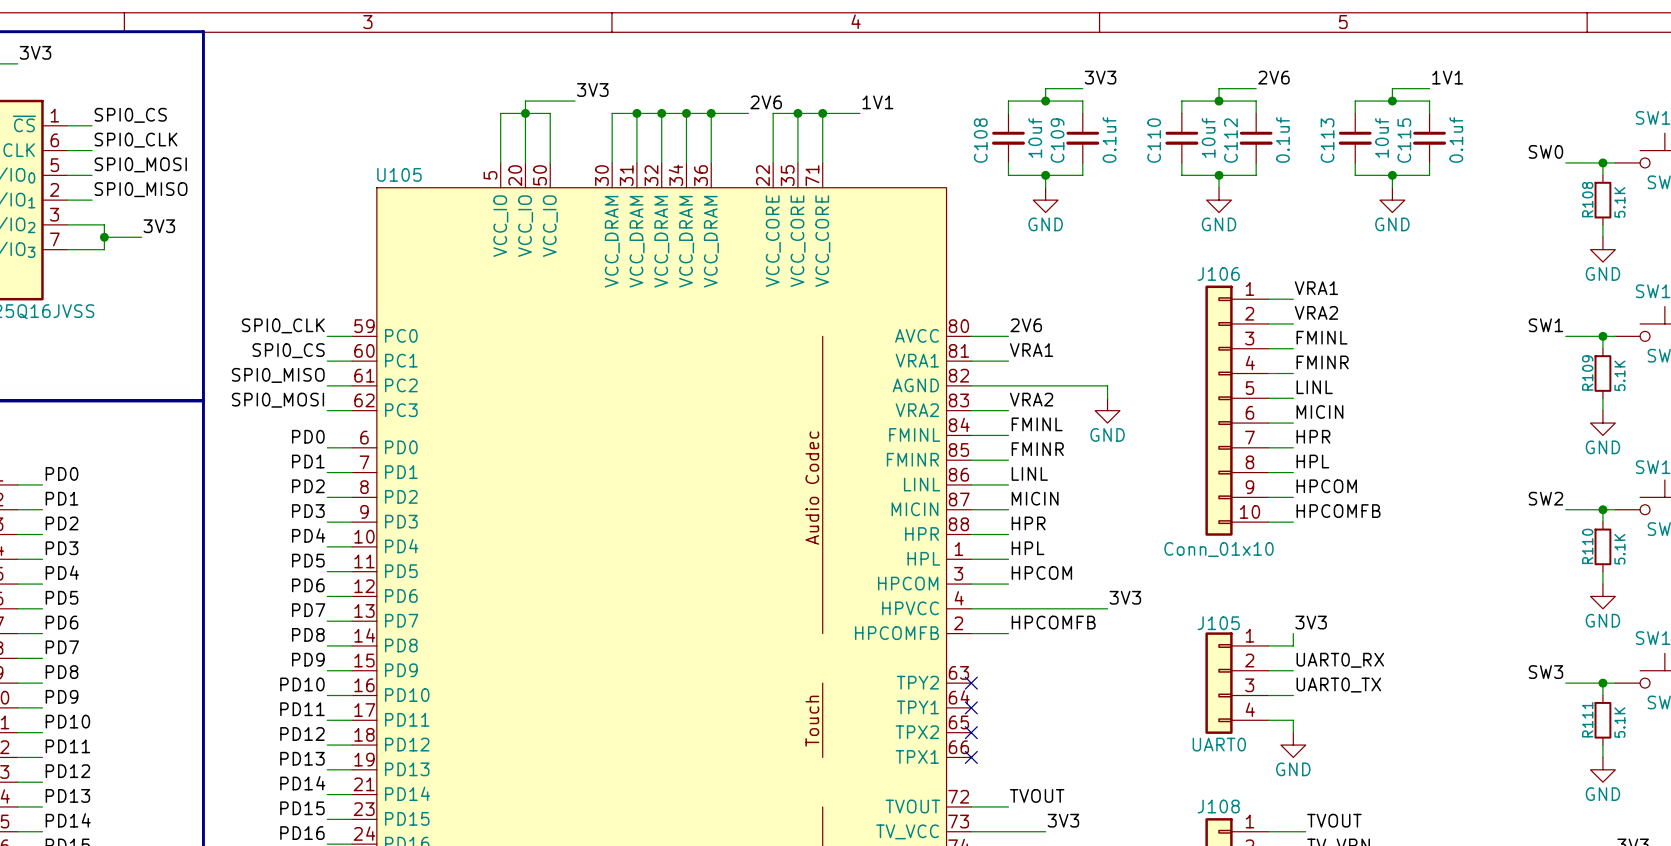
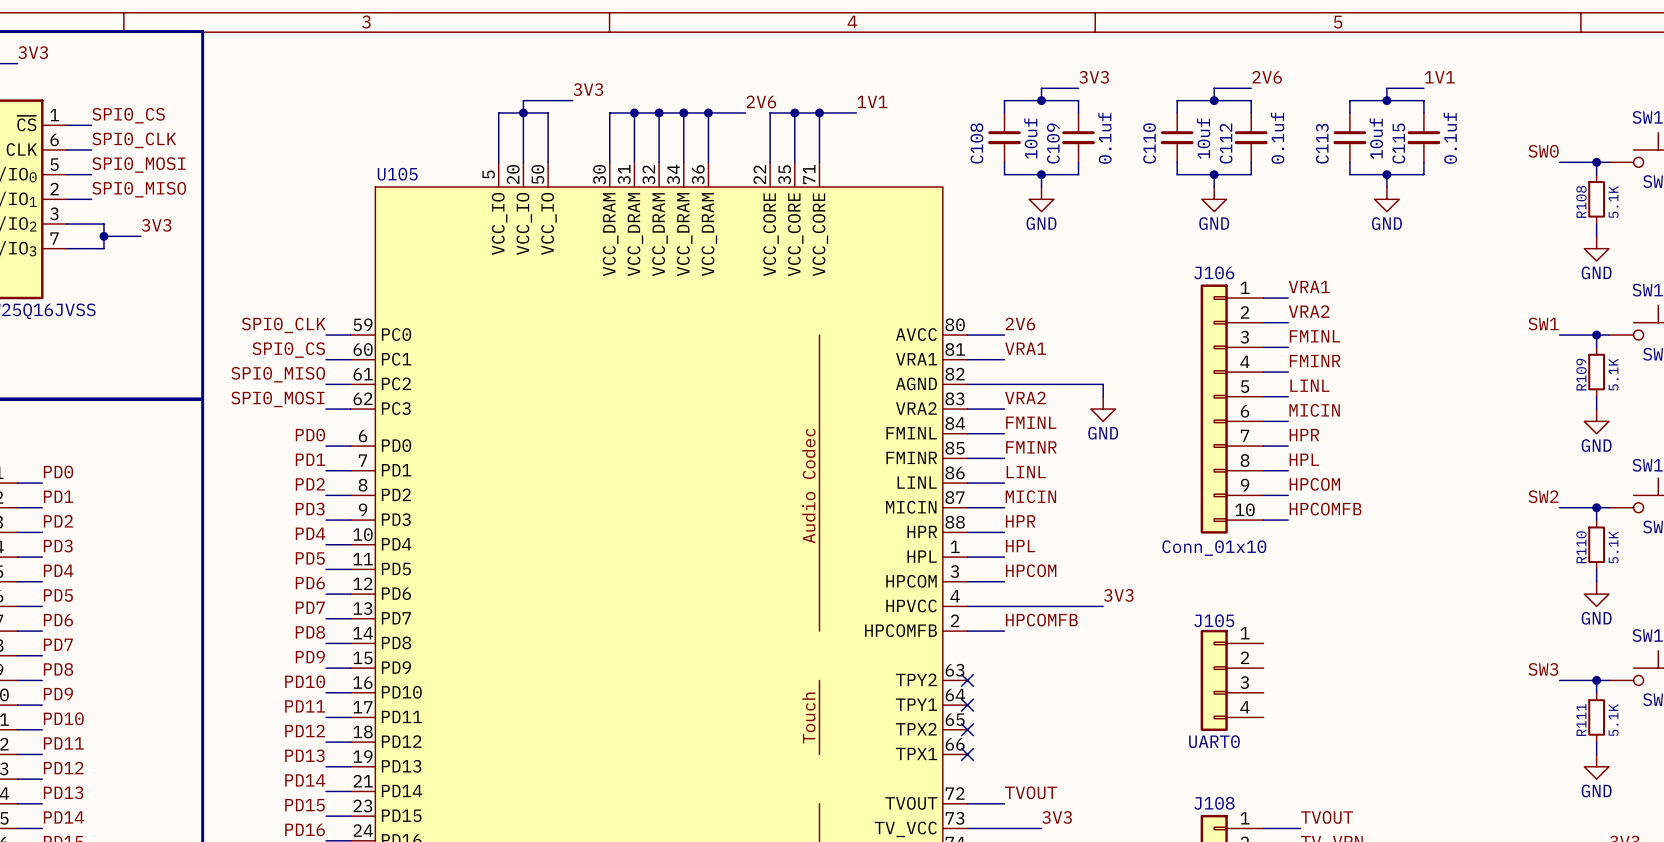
label: 3V3 (1311, 622) -> none
wire: (1293, 633) (1293, 645) (1268, 645) -> none
label: UART0_RX (1340, 660) -> none
wire: (1268, 670) (1293, 670) -> none
label: UART0_TX (1338, 685) -> none
wire: (1268, 695) (1293, 695) -> none
wire: (1268, 720) (1293, 720) (1293, 732) -> none
power symbol: GND (1293, 745) -> none

